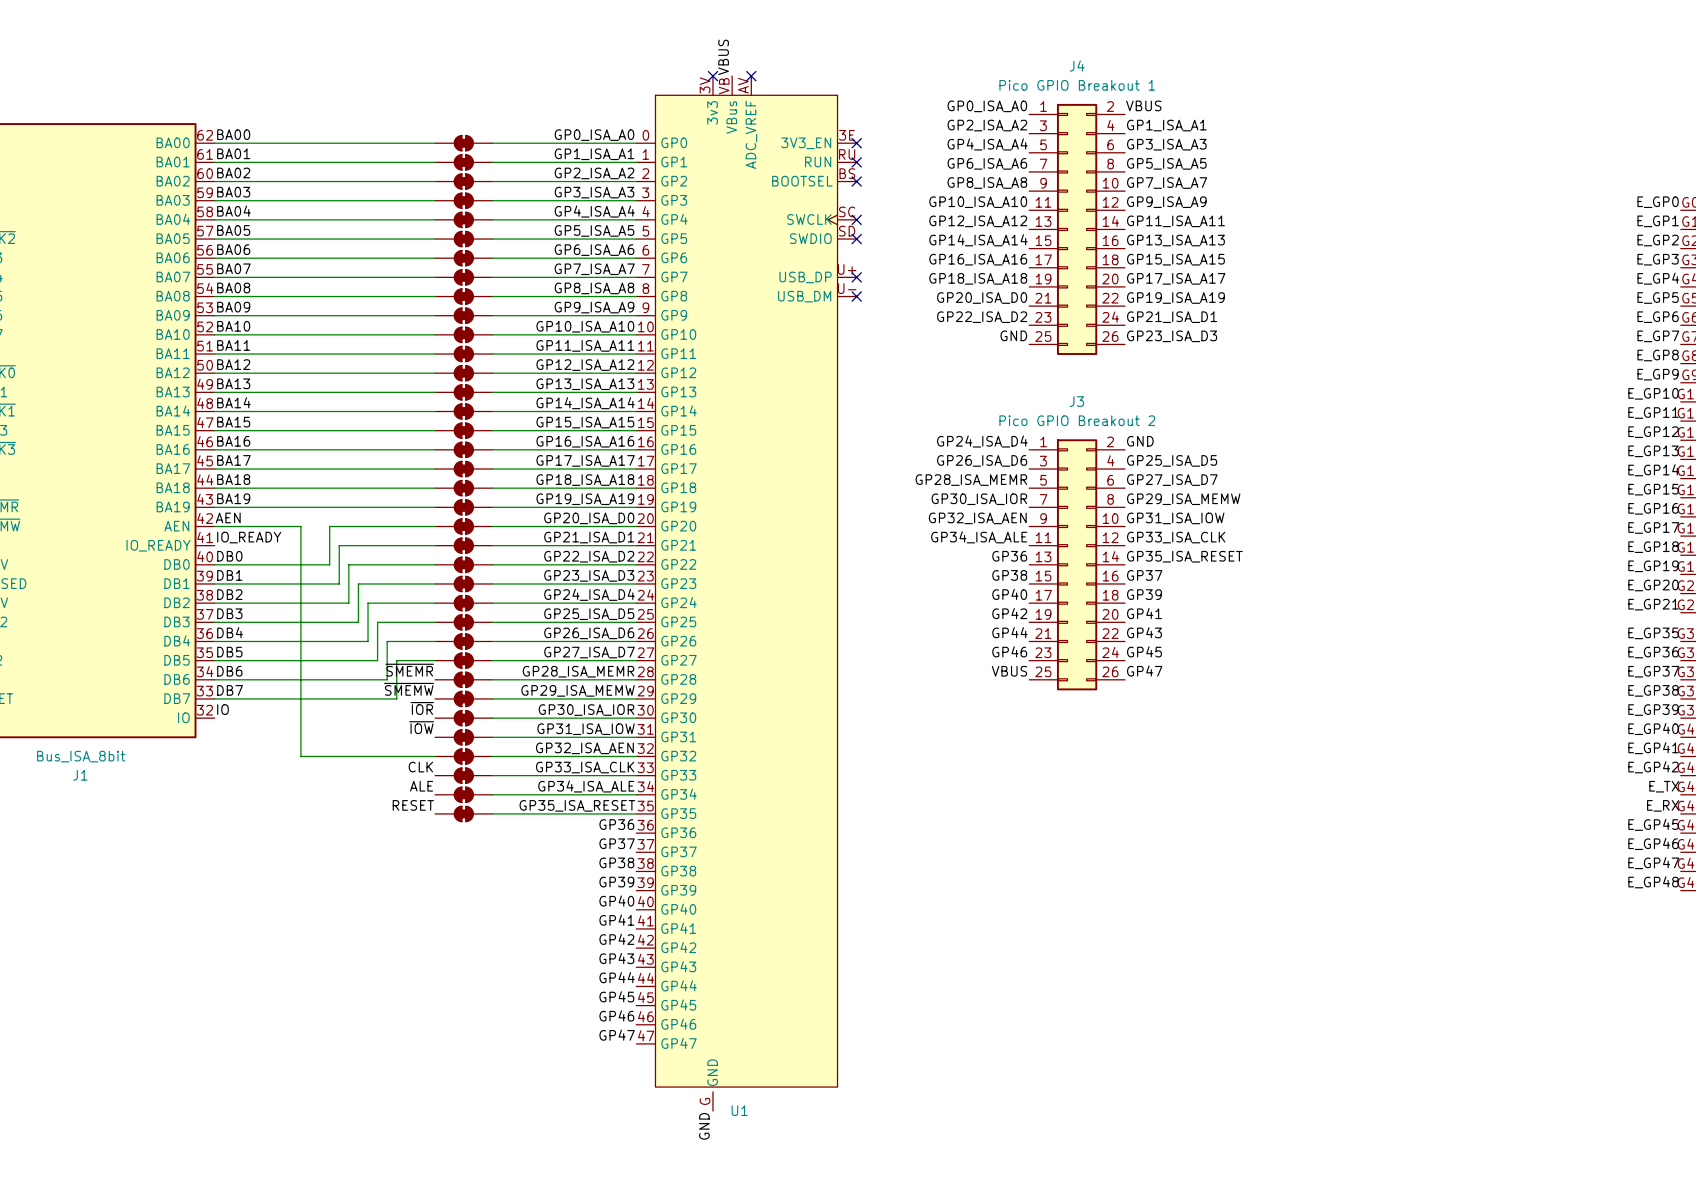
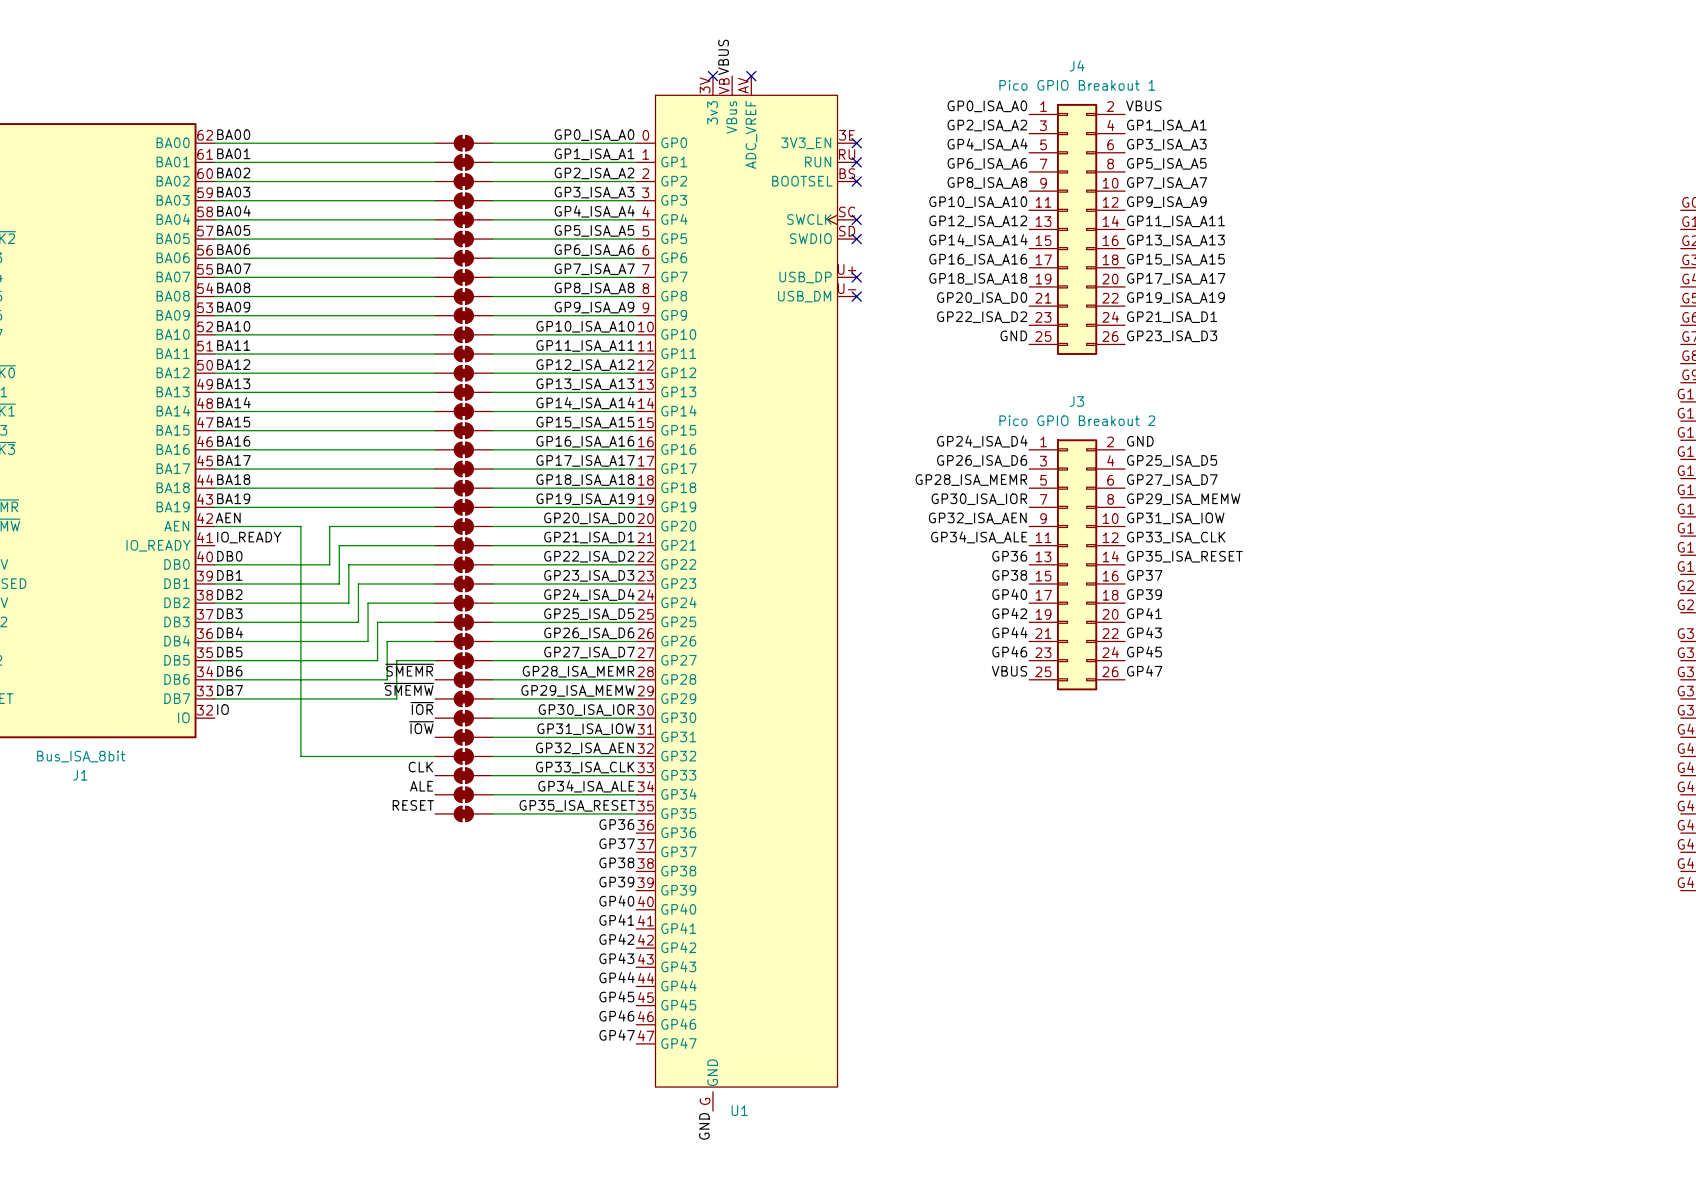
label: E_GP0 (1658, 202) -> none
label: E_GP1 (1658, 221) -> none
label: E_GP2 (1658, 240) -> none
label: E_GP3 (1658, 259) -> none
label: E_GP4 (1658, 278) -> none
label: E_GP5 (1658, 298) -> none
label: E_GP6 (1658, 317) -> none
label: E_GP7 (1658, 336) -> none
label: E_GP8 (1658, 355) -> none
label: E_GP9 (1658, 374) -> none
label: E_GP10 (1653, 393) -> none
label: E_GP11 (1653, 412) -> none
label: E_GP12 (1653, 432) -> none
label: E_GP13 (1653, 451) -> none
label: E_GP14 (1653, 470) -> none
label: E_GP15 (1653, 489) -> none
label: E_GP16 (1653, 508) -> none
label: E_GP17 (1653, 527) -> none
label: E_GP18 (1653, 547) -> none
label: E_GP19 (1653, 566) -> none
label: E_GP20 (1653, 585) -> none
label: E_GP21 (1653, 604) -> none
label: E_GP35 (1653, 633) -> none
label: E_GP36 (1653, 652) -> none
label: E_GP37 (1653, 671) -> none
label: E_GP38 (1653, 690) -> none
label: E_GP39 (1653, 710) -> none
label: E_GP40 (1653, 728) -> none
label: E_GP41 (1653, 748) -> none
label: E_GP42 (1653, 767) -> none
label: E_TX (1664, 786) -> none
label: E_RX (1663, 805) -> none
label: E_GP45 (1653, 824) -> none
label: E_GP46 (1653, 843) -> none
label: E_GP47 (1653, 863) -> none
label: E_GP48 (1653, 882) -> none

